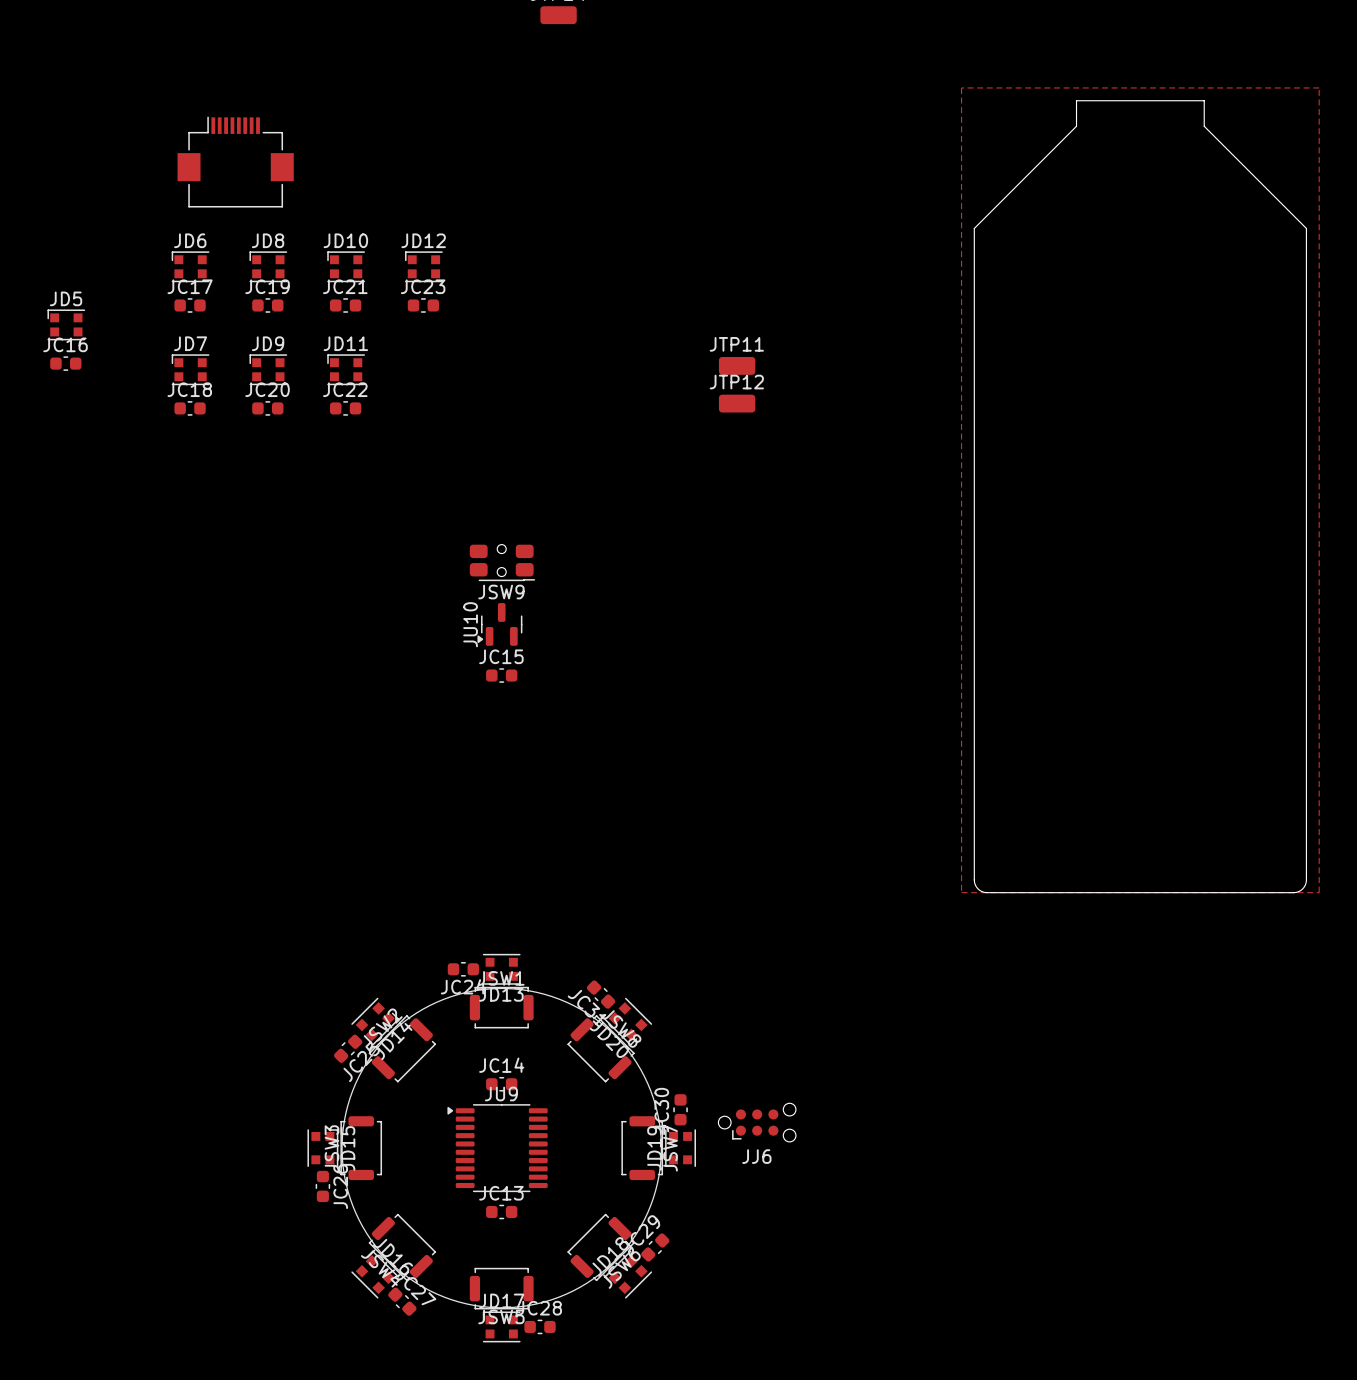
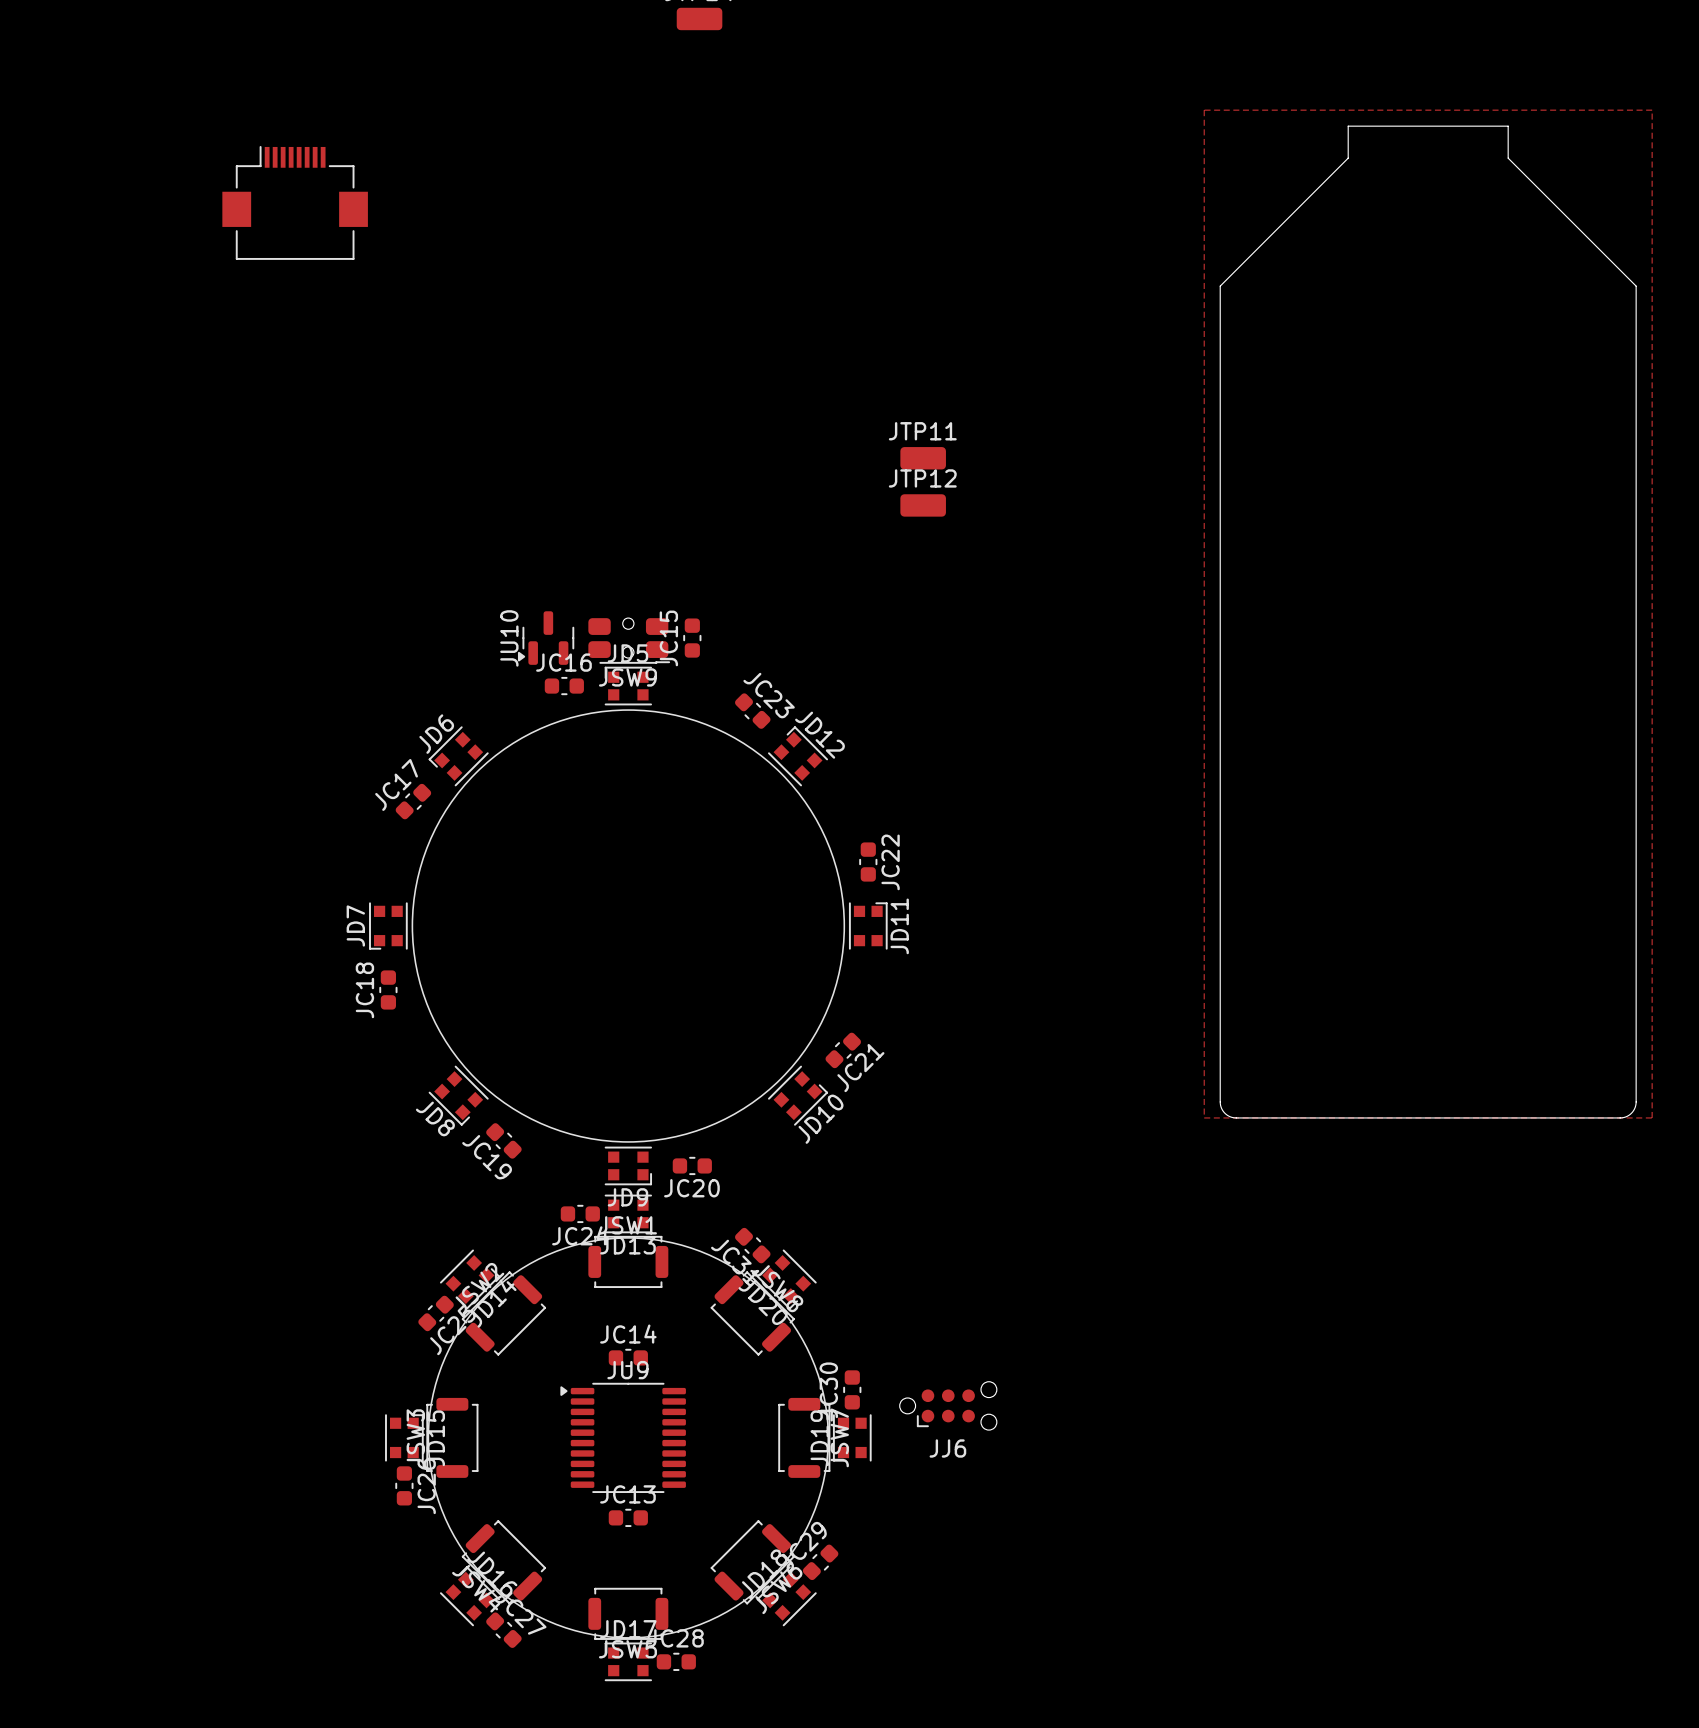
JD6 rotation: 0° (190, 266) -> 45° counterclockwise (458, 756)
JD6 position: (190, 266) -> (458, 756)
JD8 rotation: 0° (268, 266) -> 135° counterclockwise (458, 1095)
JD8 position: (268, 266) -> (458, 1095)
JD10 rotation: 0° (346, 266) -> 135° clockwise (798, 1095)
JD10 position: (346, 266) -> (798, 1095)
JD12 rotation: 0° (423, 266) -> 45° clockwise (798, 756)
JD12 position: (423, 266) -> (798, 756)
JC19 name position: JC19 (267, 286) -> JC19 (487, 1157)
JC21 name position: JC21 (345, 286) -> JC21 (860, 1068)
JC17 rotation: 0° (190, 305) -> 45° counterclockwise (413, 801)
JC17 position: (190, 305) -> (413, 801)
JC19 rotation: 0° (267, 305) -> 45° clockwise (503, 1140)
JC19 position: (267, 305) -> (503, 1140)
JC21 rotation: 0° (345, 305) -> 45° counterclockwise (843, 1050)
JC21 position: (345, 305) -> (843, 1050)
JC23 rotation: 0° (423, 305) -> 45° clockwise (752, 711)
JC23 position: (423, 305) -> (752, 711)
JD5 position: (66, 324) -> (628, 686)
JC16 position: (65, 363) -> (564, 686)
JD7 rotation: 0° (190, 369) -> 90° counterclockwise (388, 926)
JD7 position: (190, 369) -> (388, 926)
JD9 rotation: 0° (268, 369) -> 180° (628, 1165)
JD9 position: (268, 369) -> (628, 1165)
JD11 rotation: 0° (346, 369) -> 90° clockwise (868, 926)
JD11 position: (346, 369) -> (868, 926)
JC18 name position: JC18 (189, 389) -> JC18 (364, 990)
JC20 name position: JC20 (267, 389) -> JC20 (691, 1188)
JC18 rotation: 0° (190, 408) -> 90° clockwise (388, 989)
JC18 position: (190, 408) -> (388, 989)
JC20 position: (267, 408) -> (692, 1165)
JC22 rotation: 0° (345, 408) -> 90° clockwise (868, 862)
JC22 position: (345, 408) -> (868, 862)
JSW9 position: (502, 562) -> (629, 640)
drawing: none -> [411, 709, 846, 1143]
JU10 position: (499, 624) -> (546, 638)
JC15 name position: JC15 (501, 656) -> JC15 (668, 638)
JC15 rotation: 0° (501, 675) -> 90° clockwise (692, 638)
JC15 position: (501, 675) -> (692, 638)

